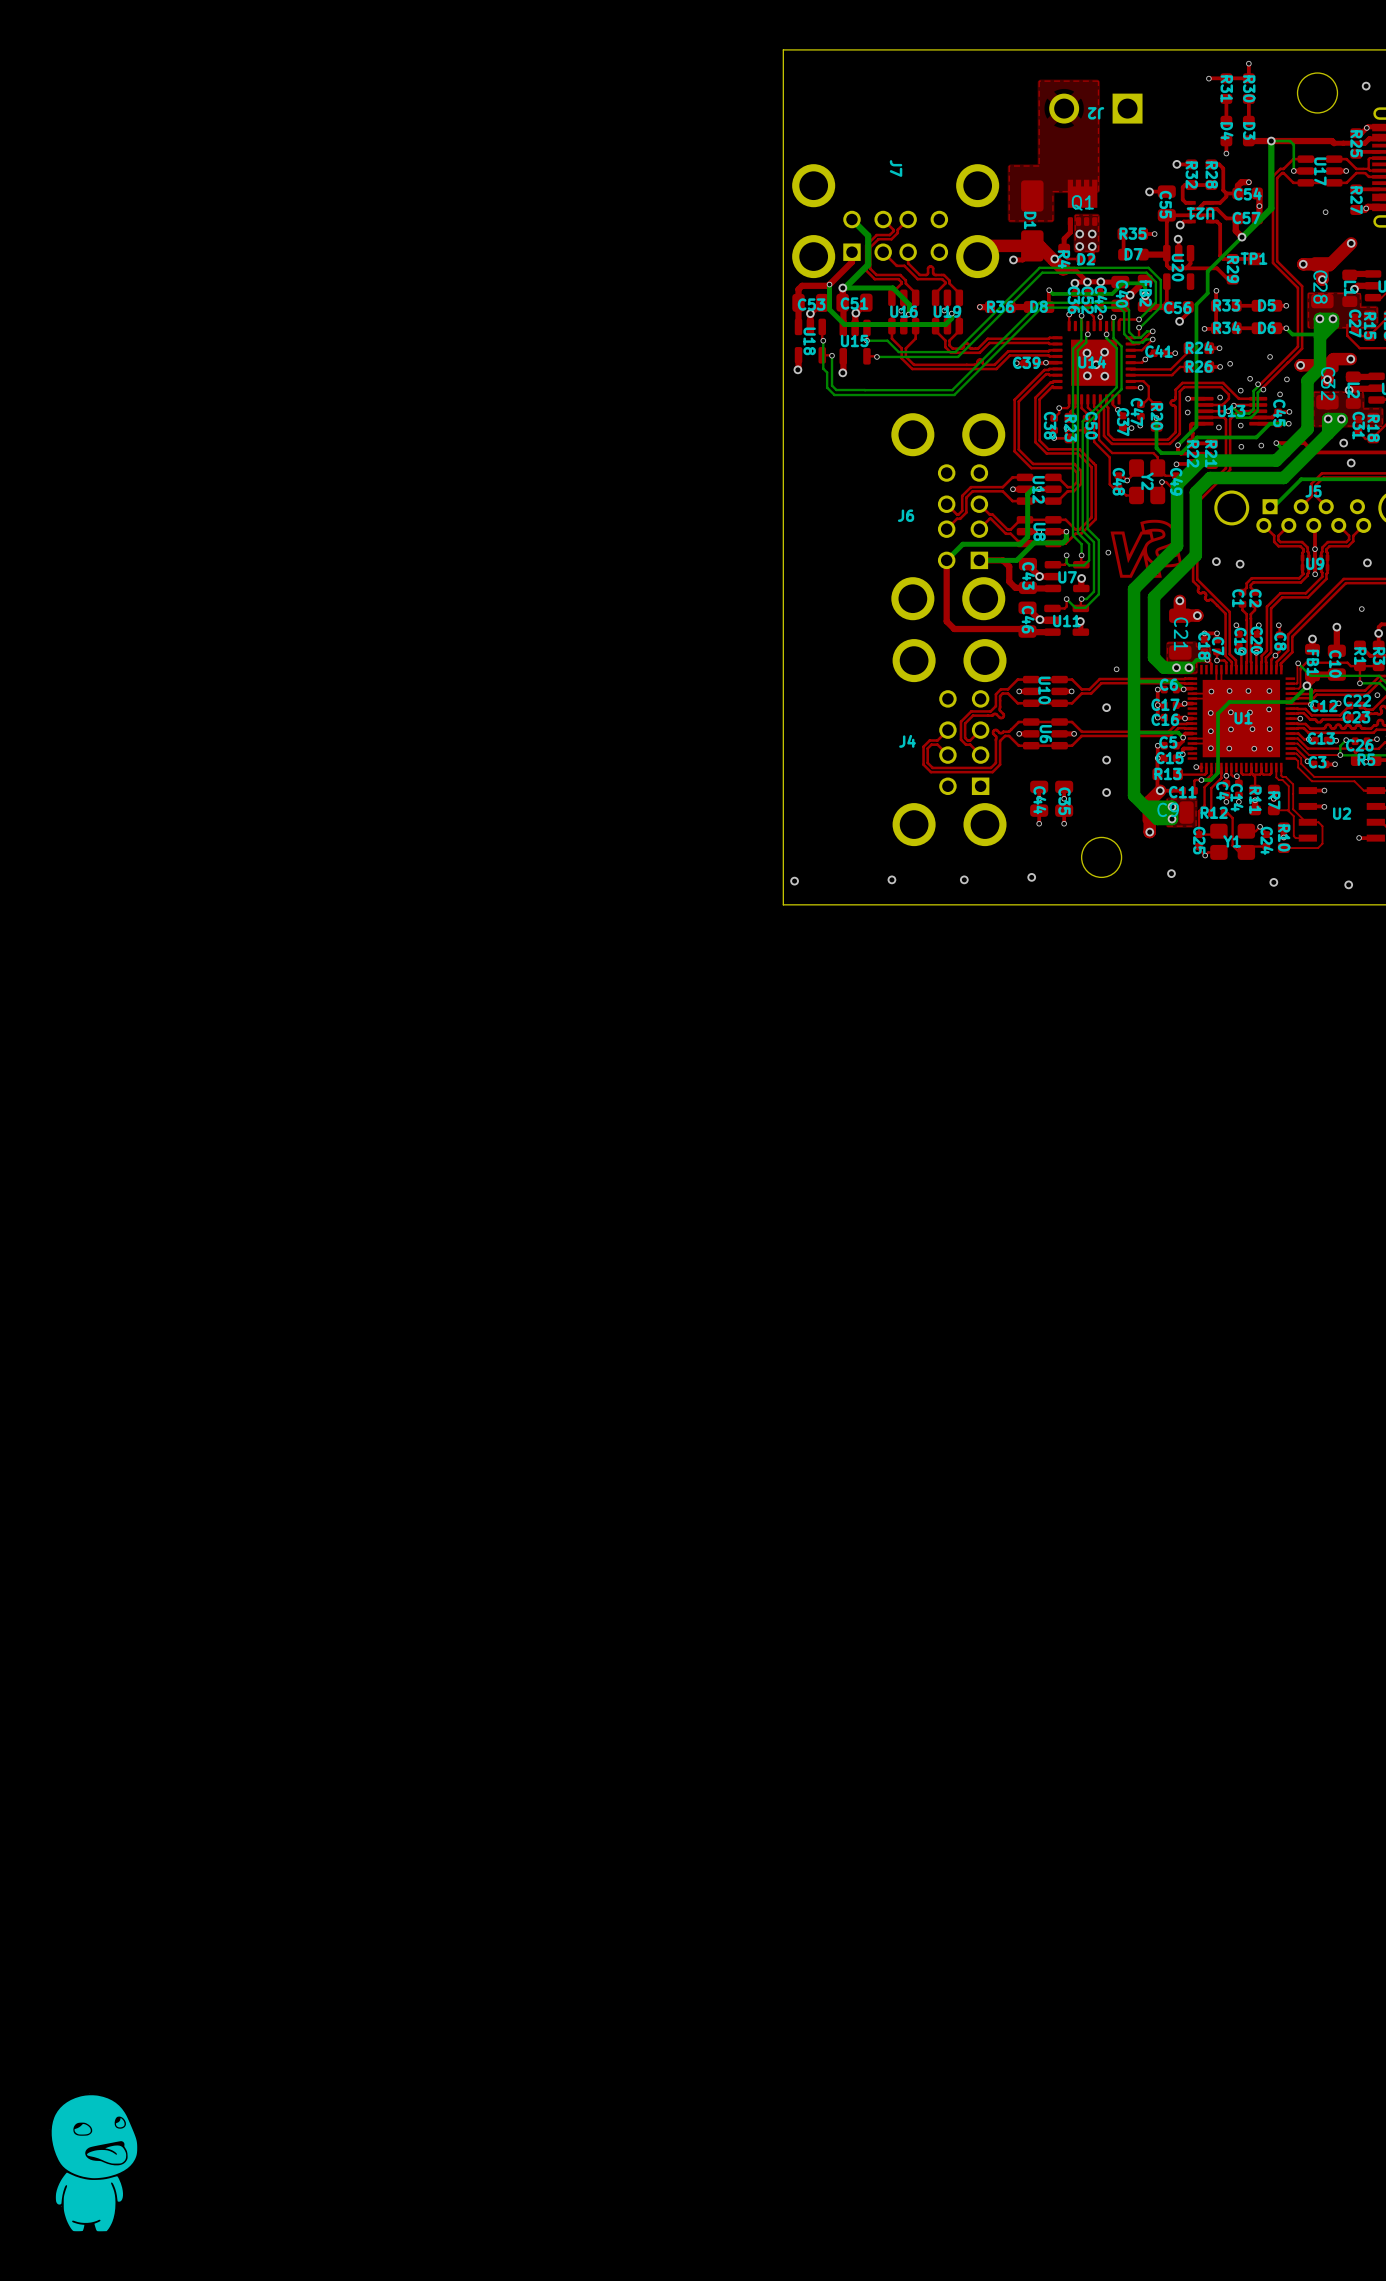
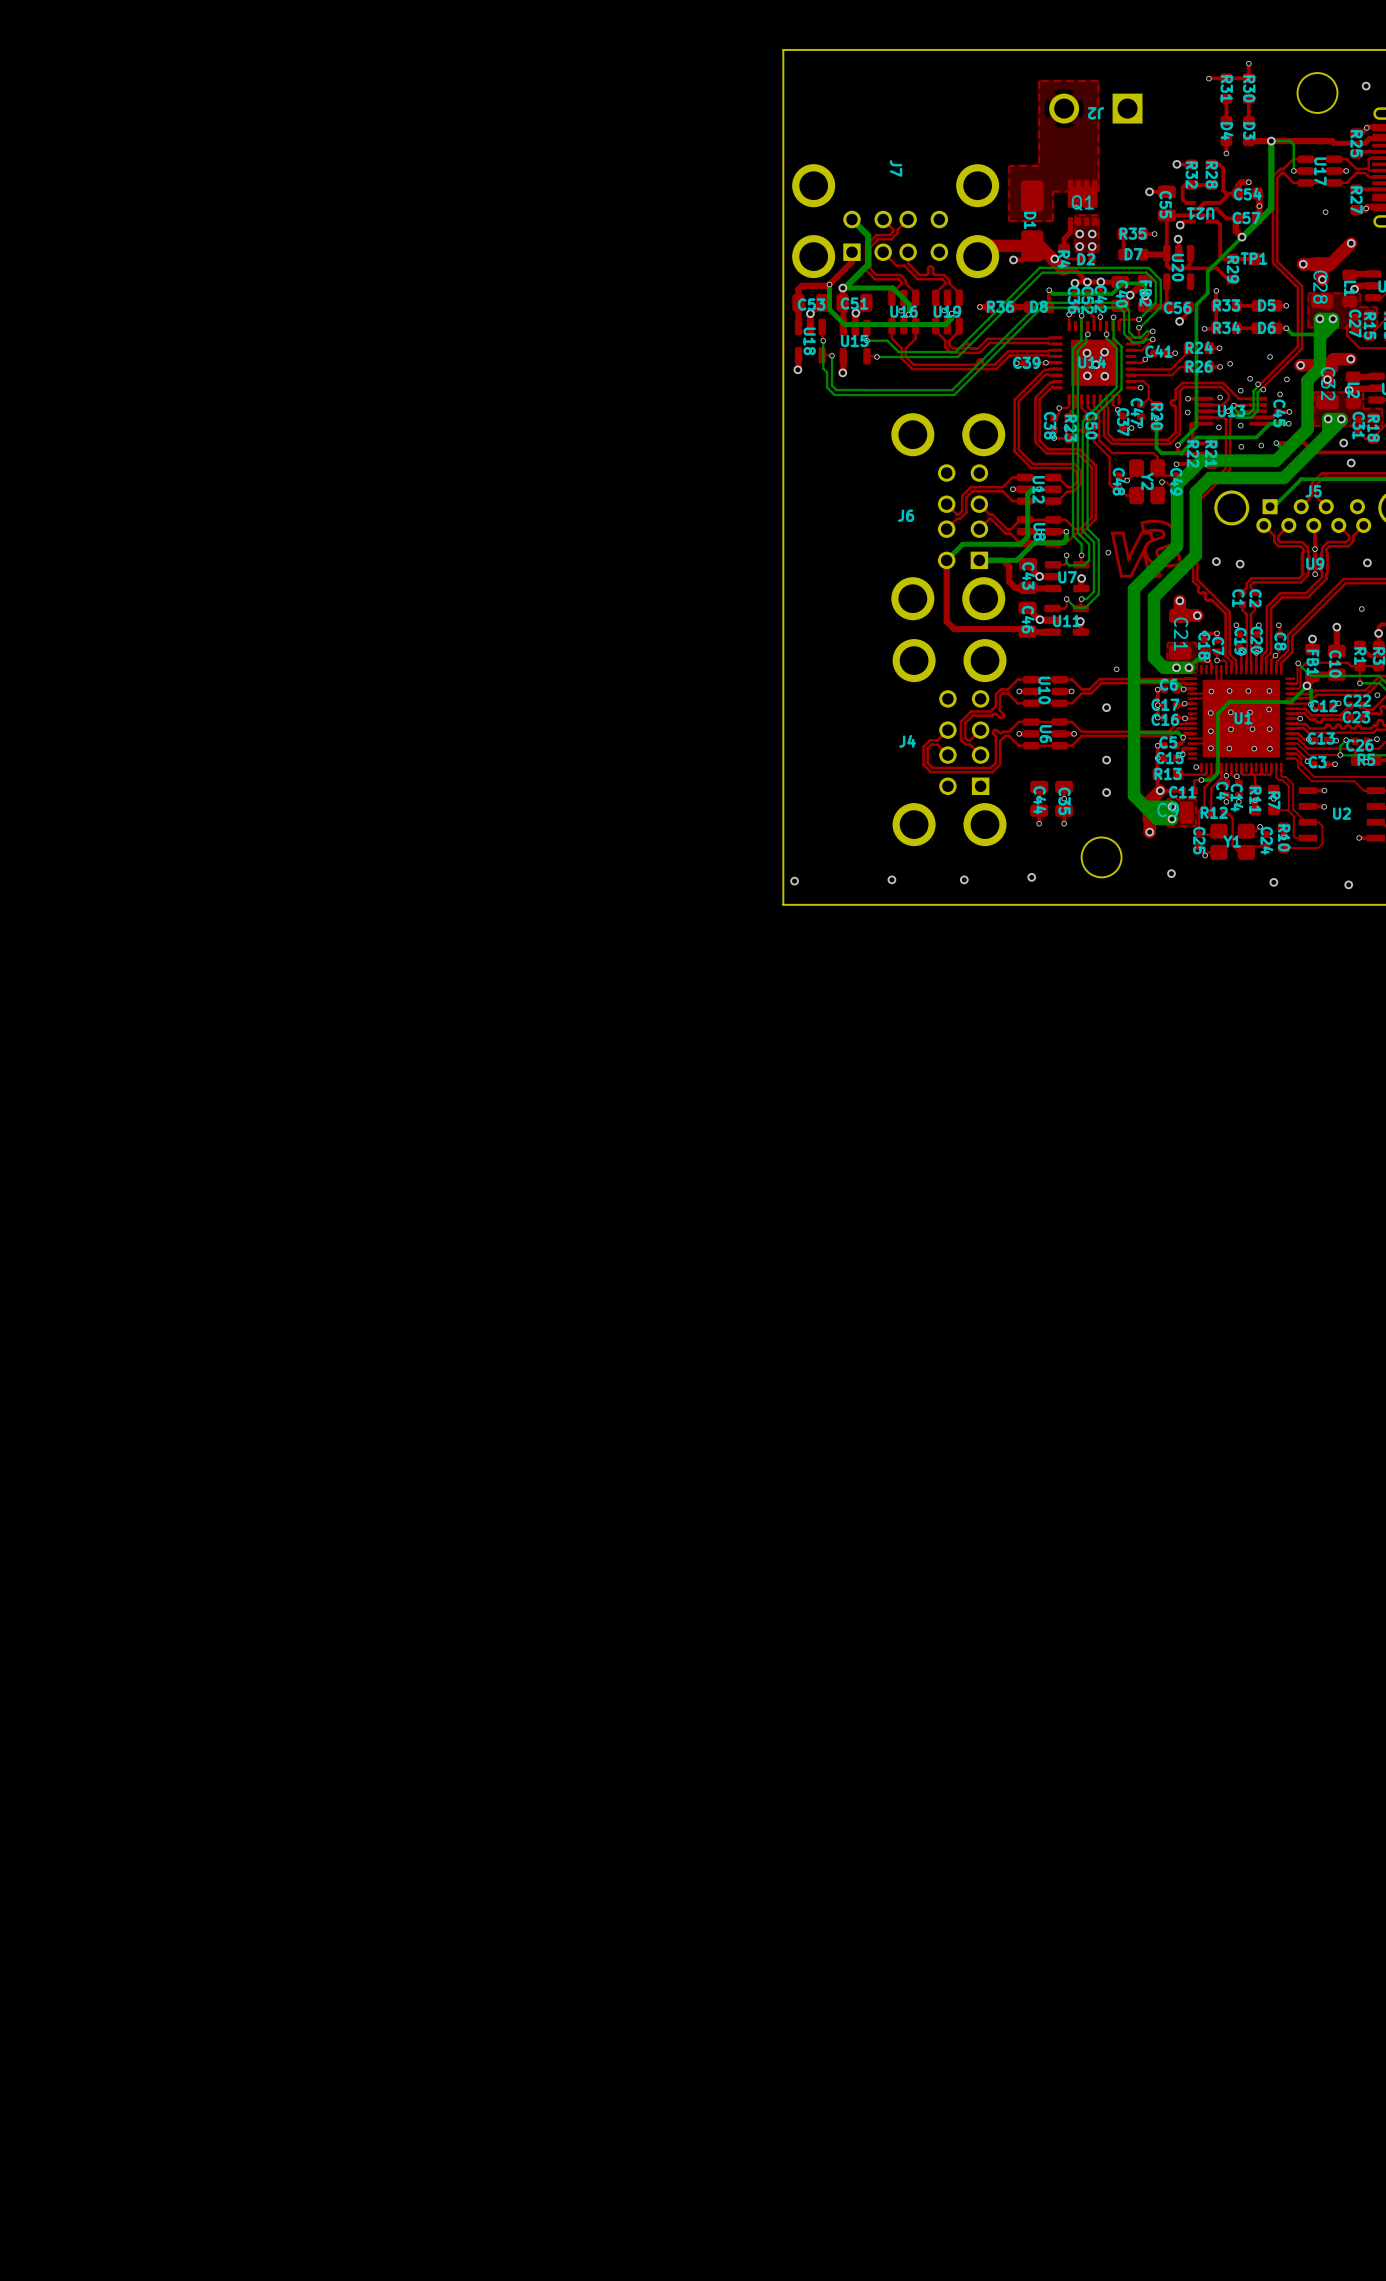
drawing: [49, 2093, 138, 2232] -> none

